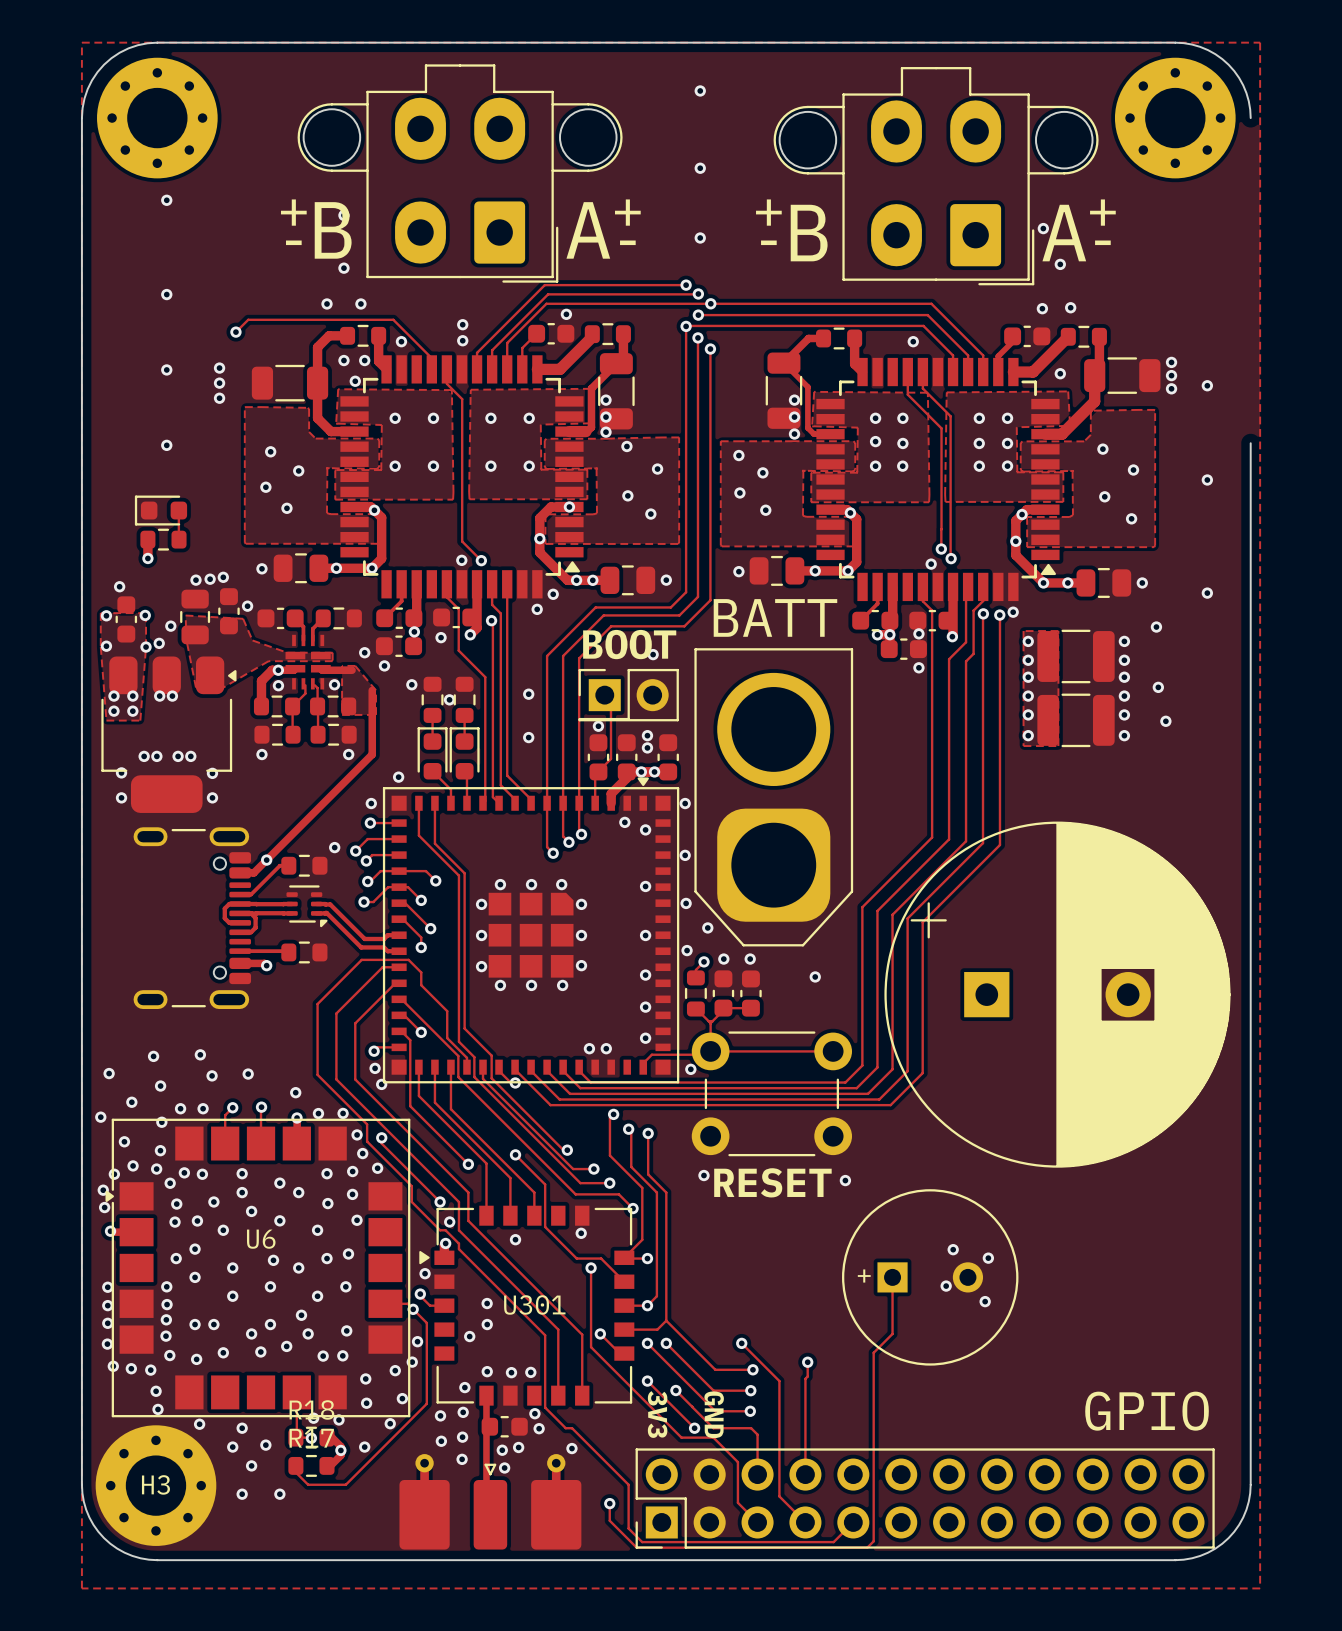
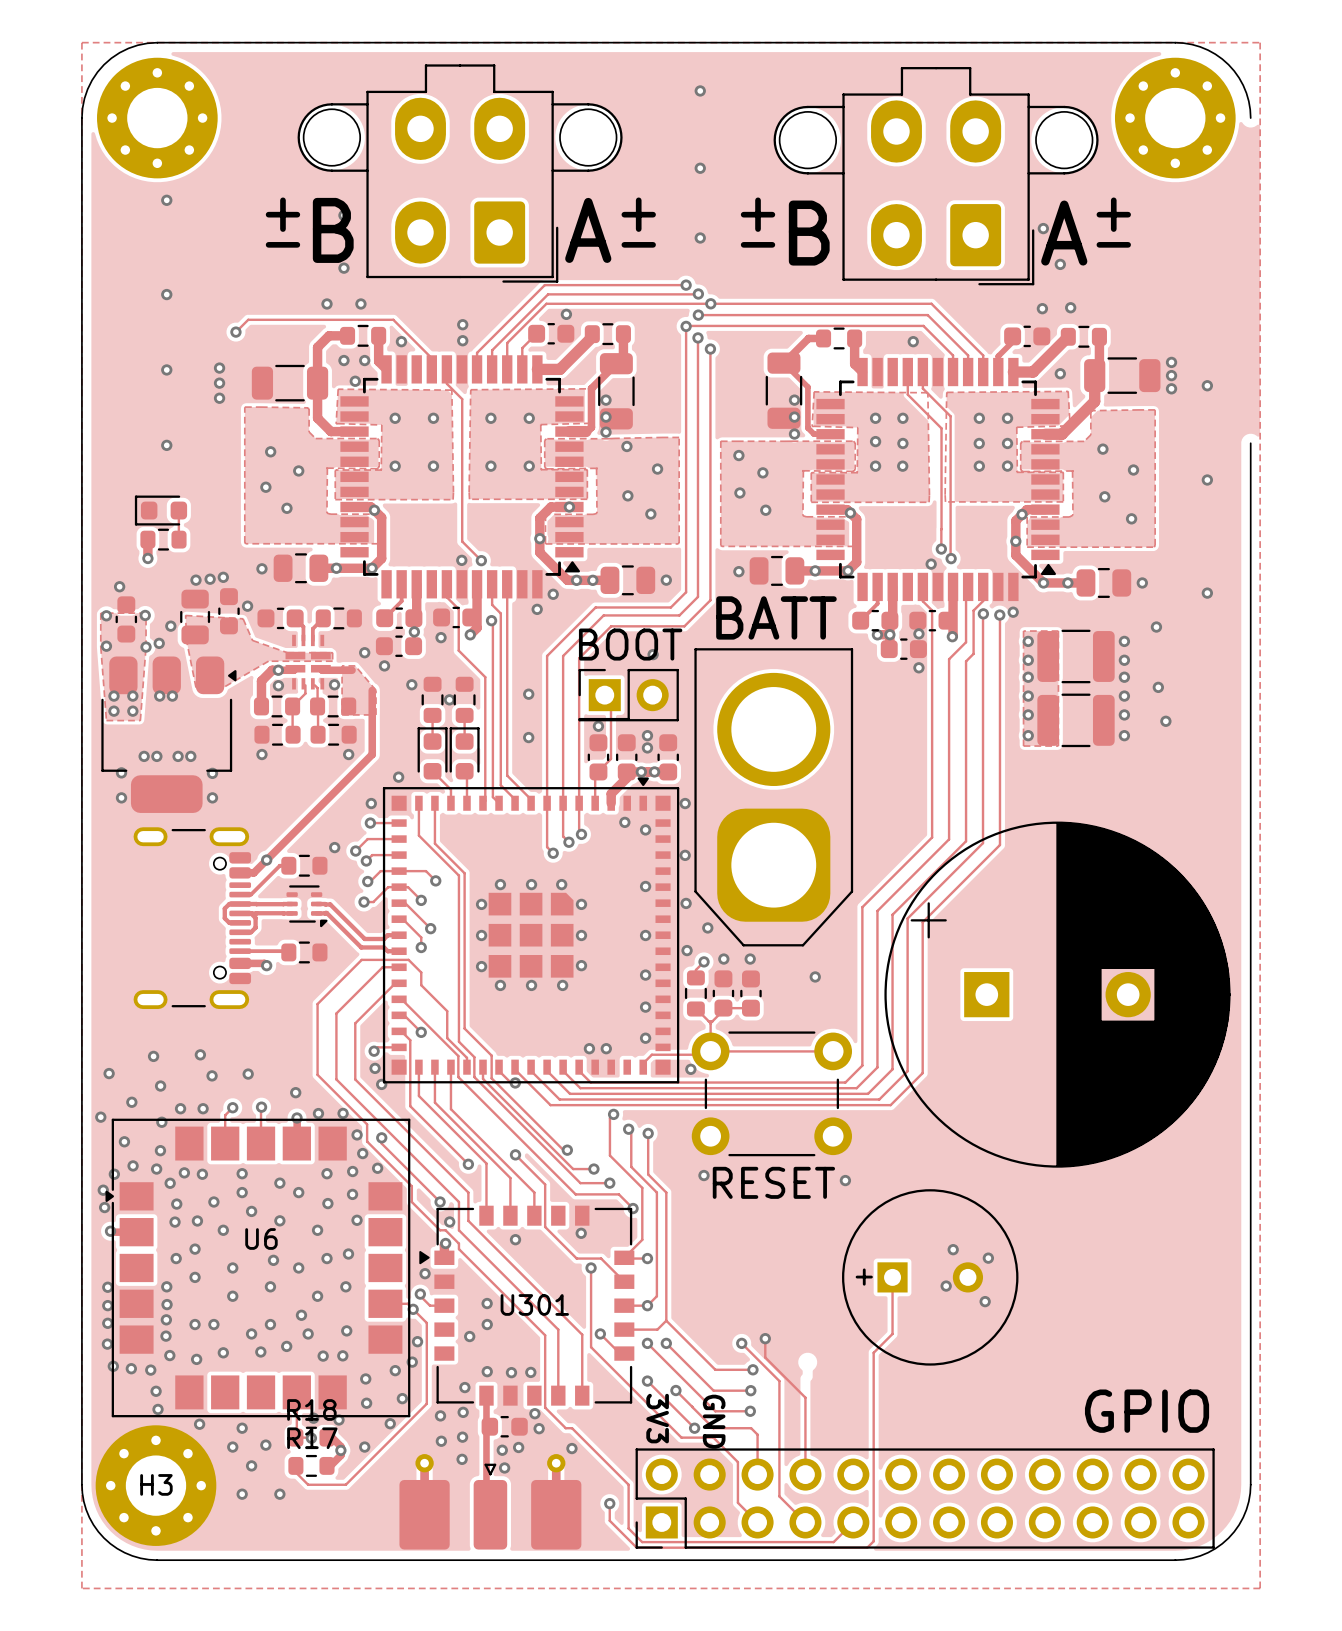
track: (807, 1362) (805, 1397) -> (765, 1338) (765, 1357) (805, 1397)
via position: (807, 1362) -> (765, 1338)

